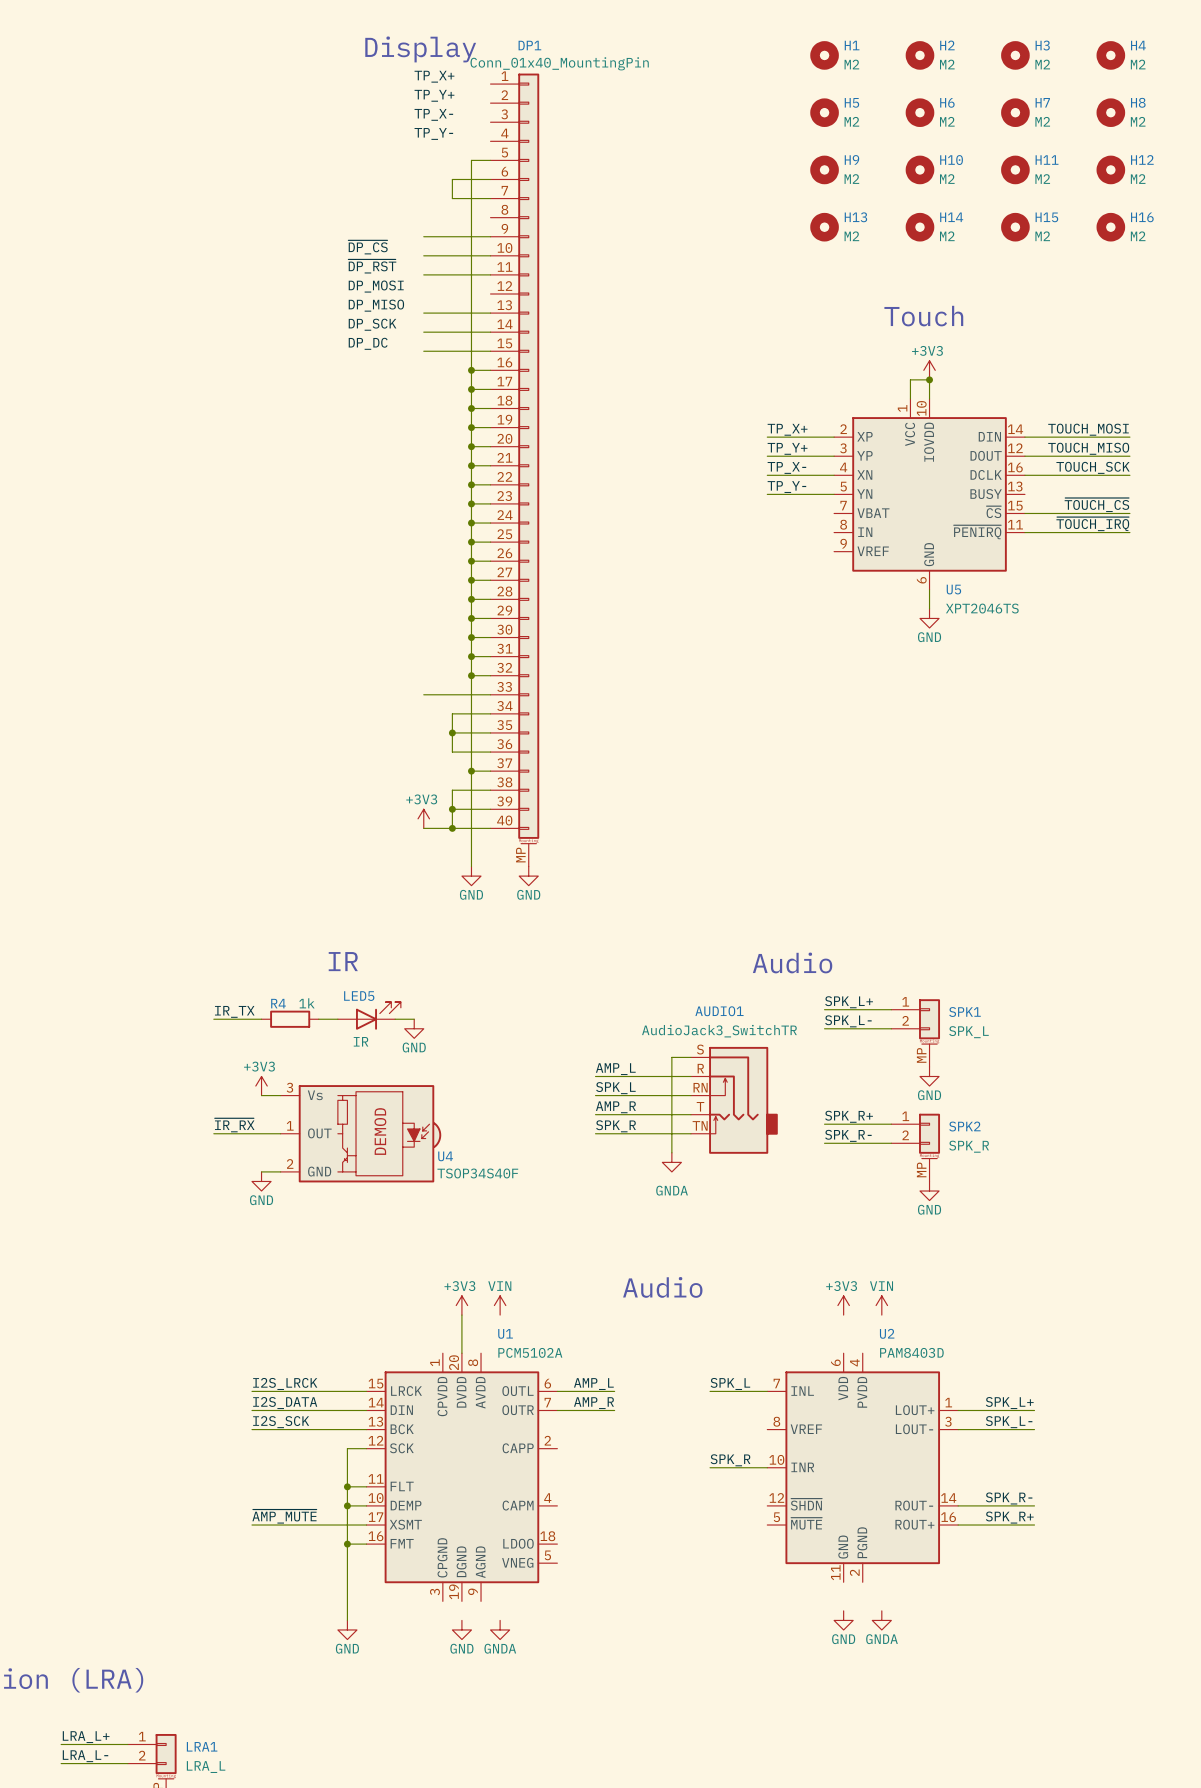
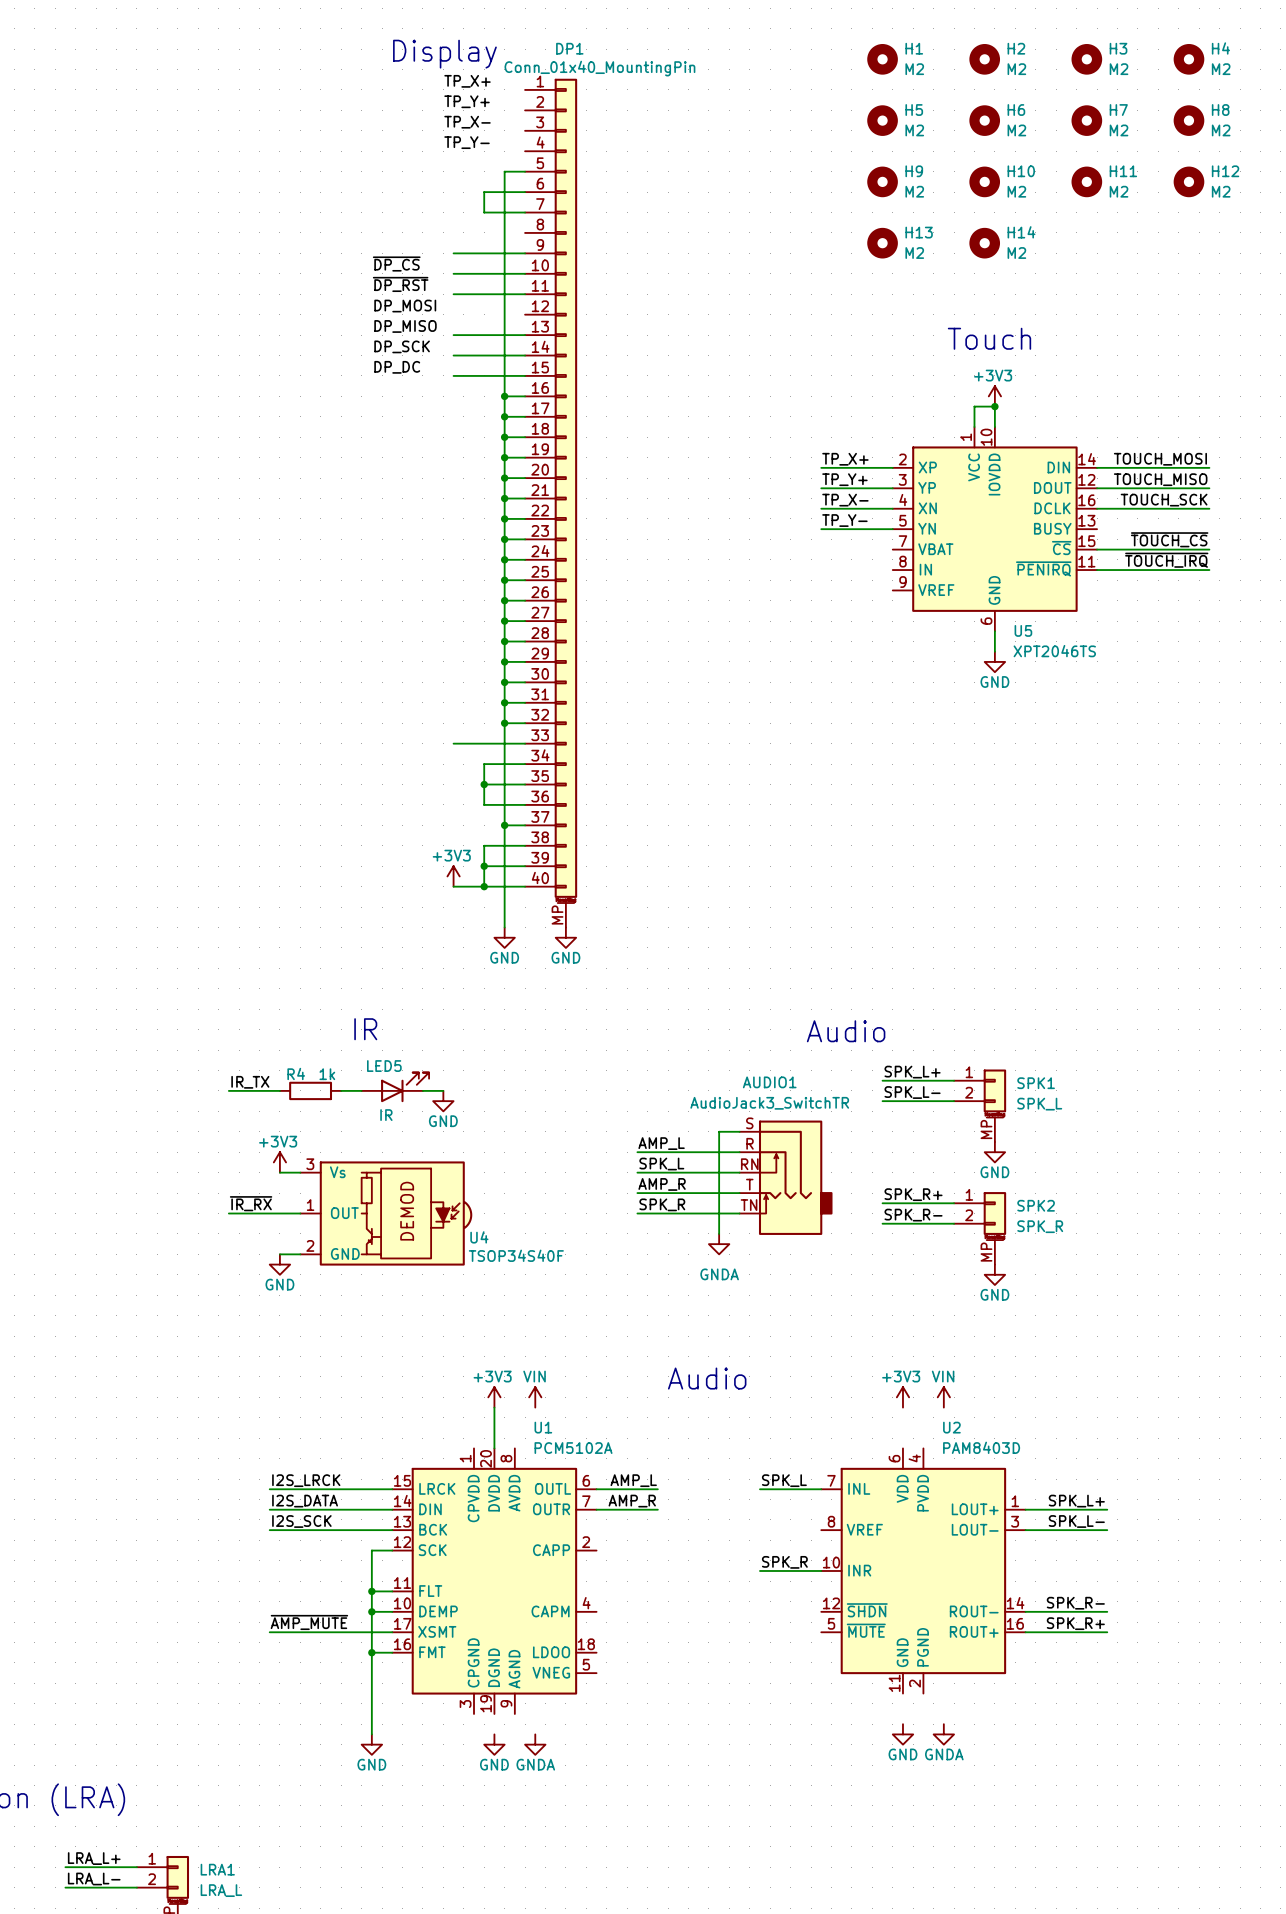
H15: M2 (1015, 227) -> none
H16: M2 (1110, 227) -> none

